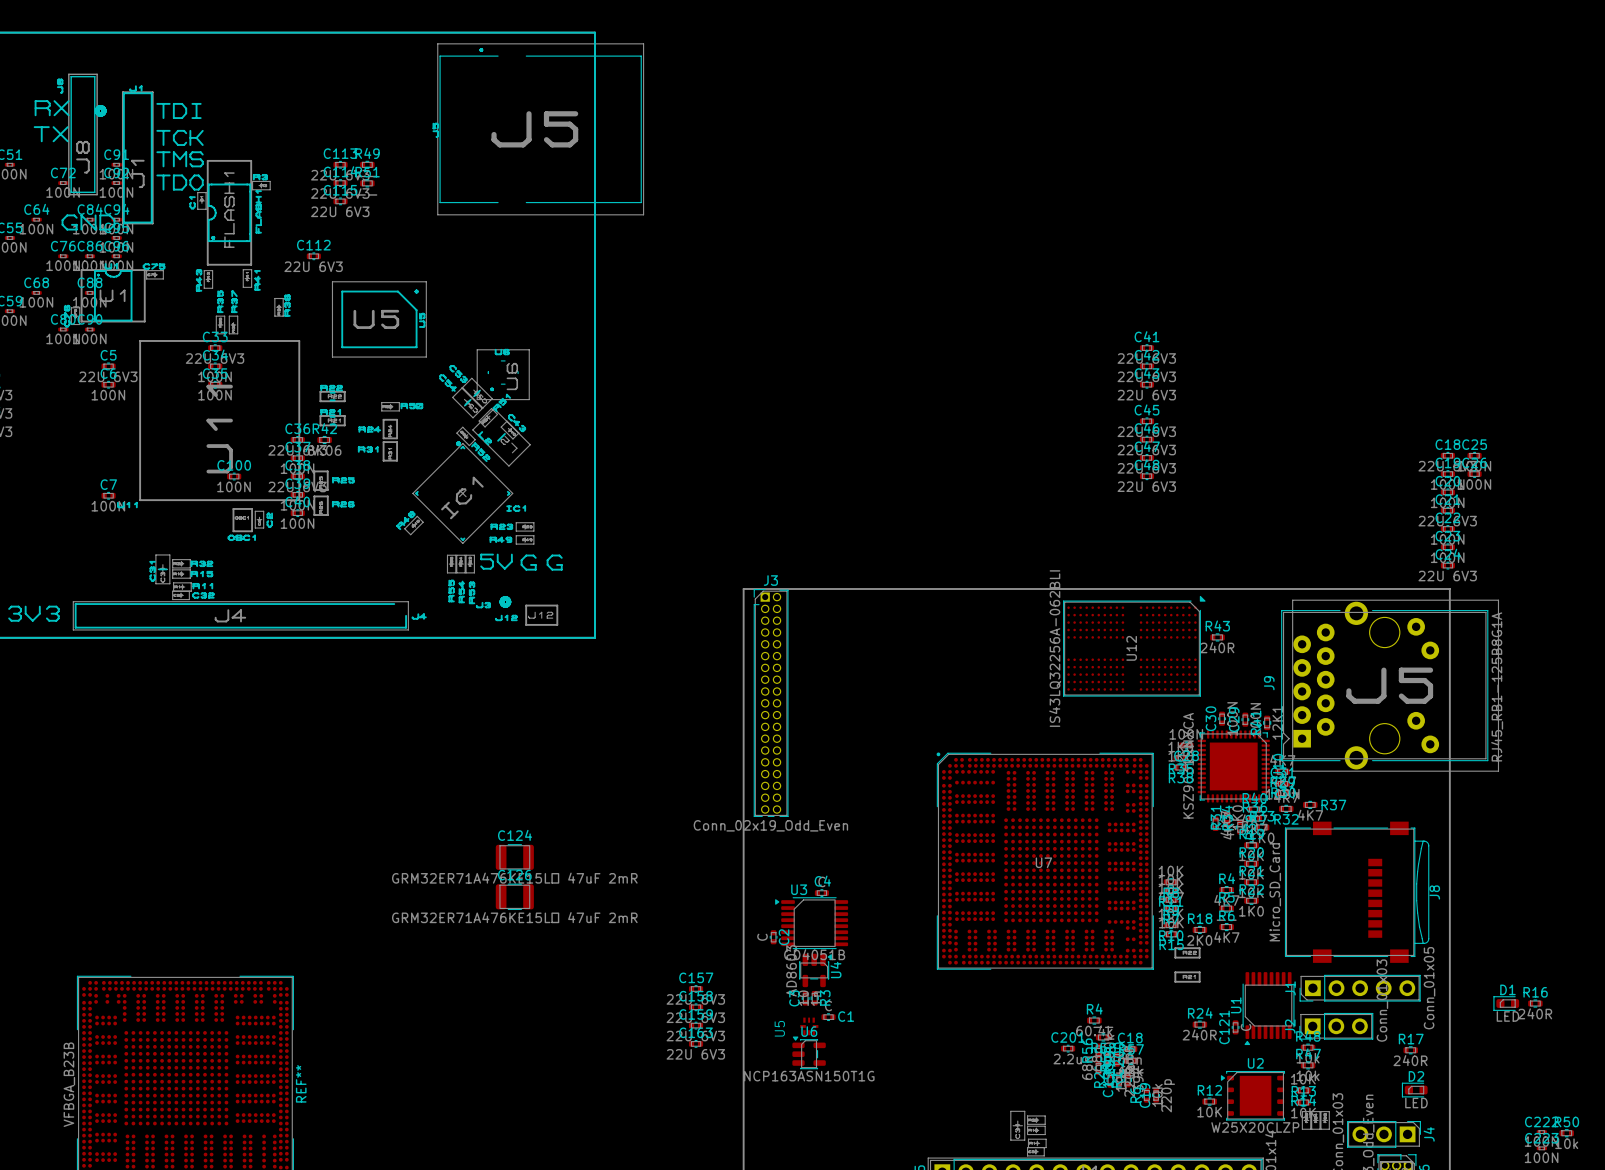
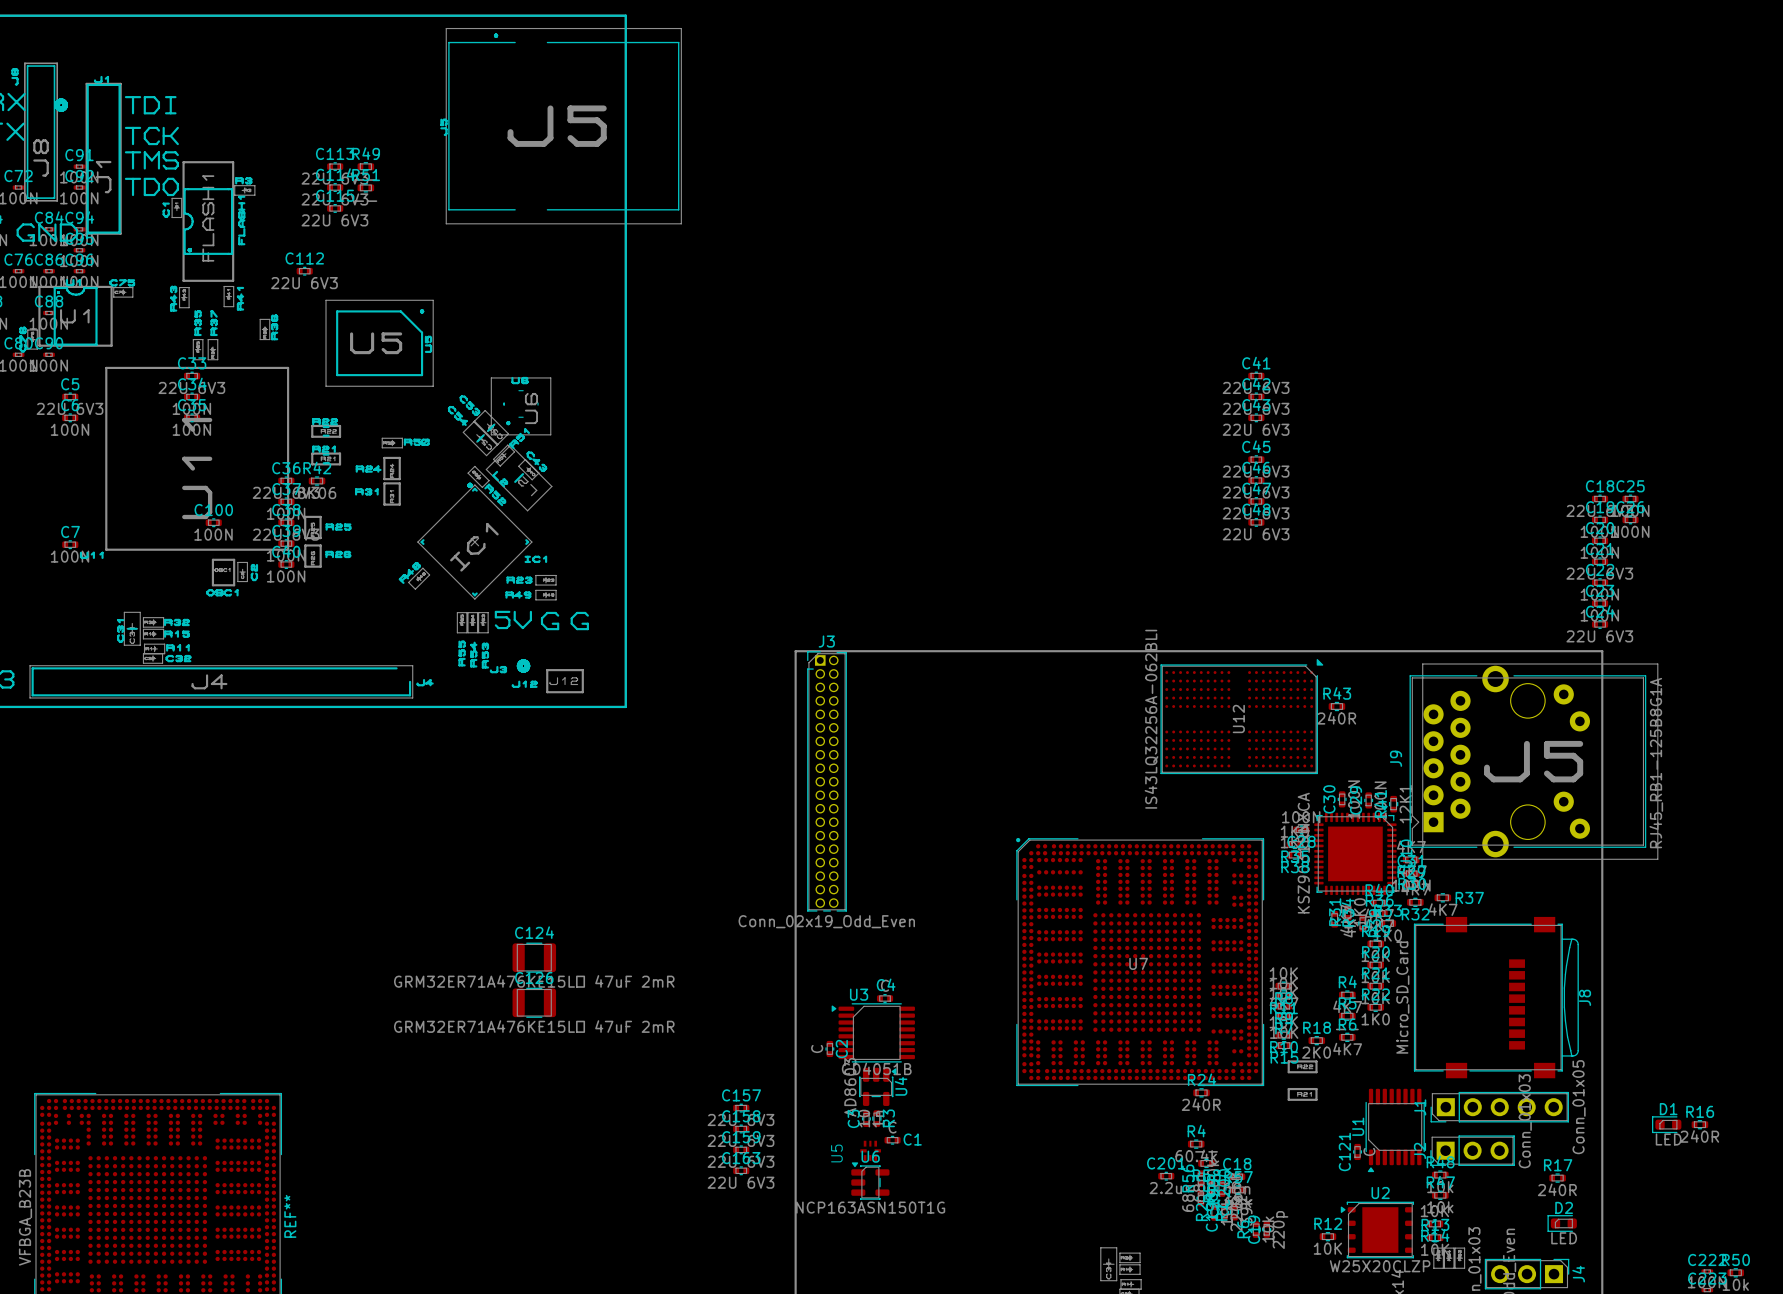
R24 position: (1199, 1024) -> (1201, 1092)

